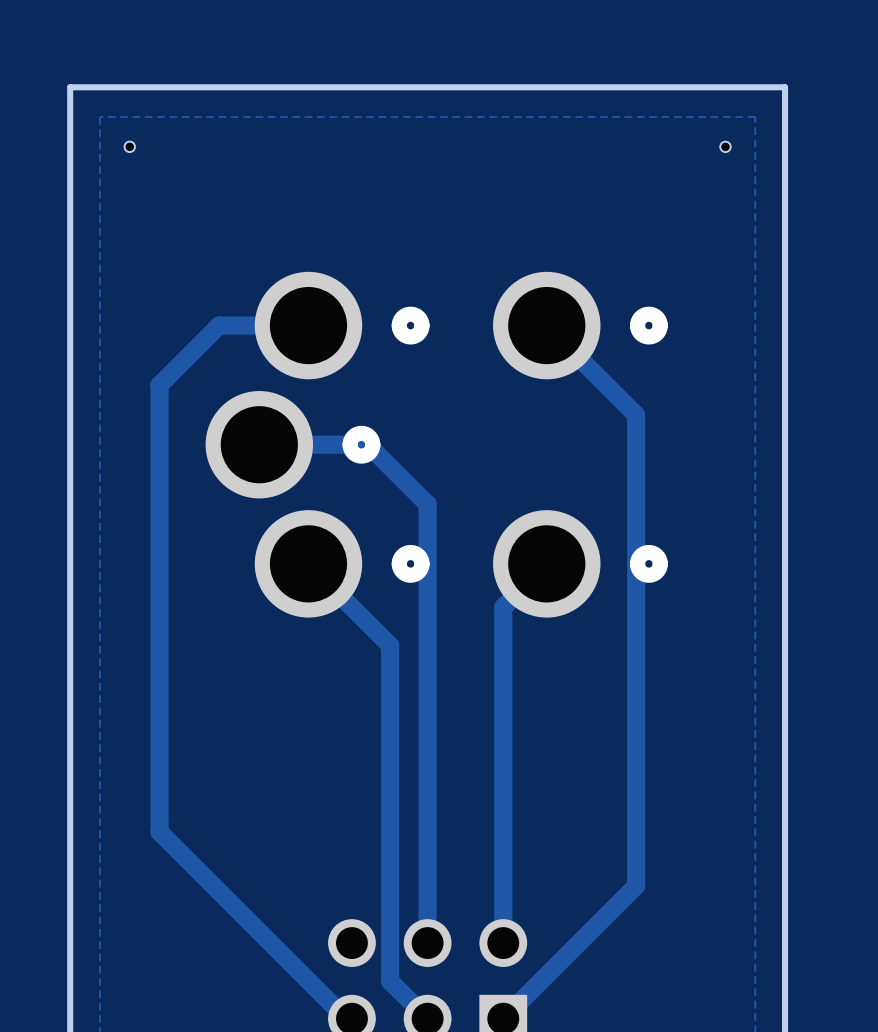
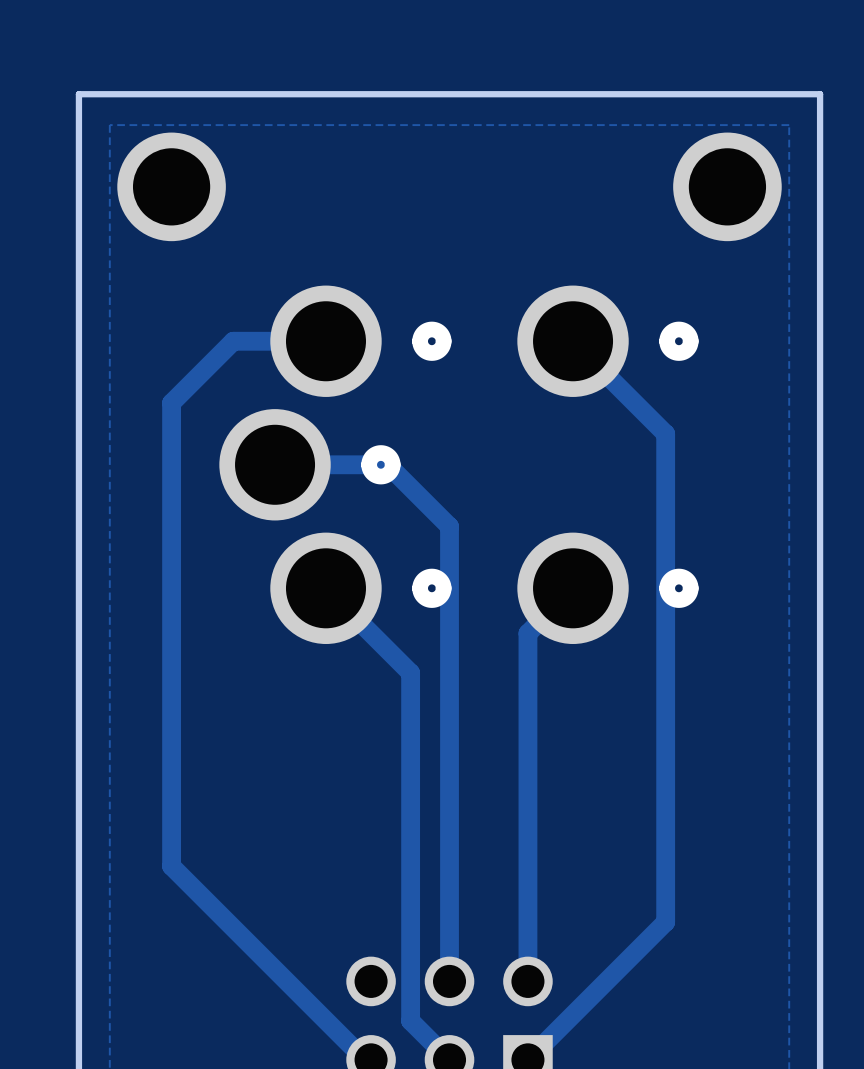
hole: (129, 146) -> none
hole: (725, 146) -> none
part: none -> (171, 186)
part: none -> (727, 186)

